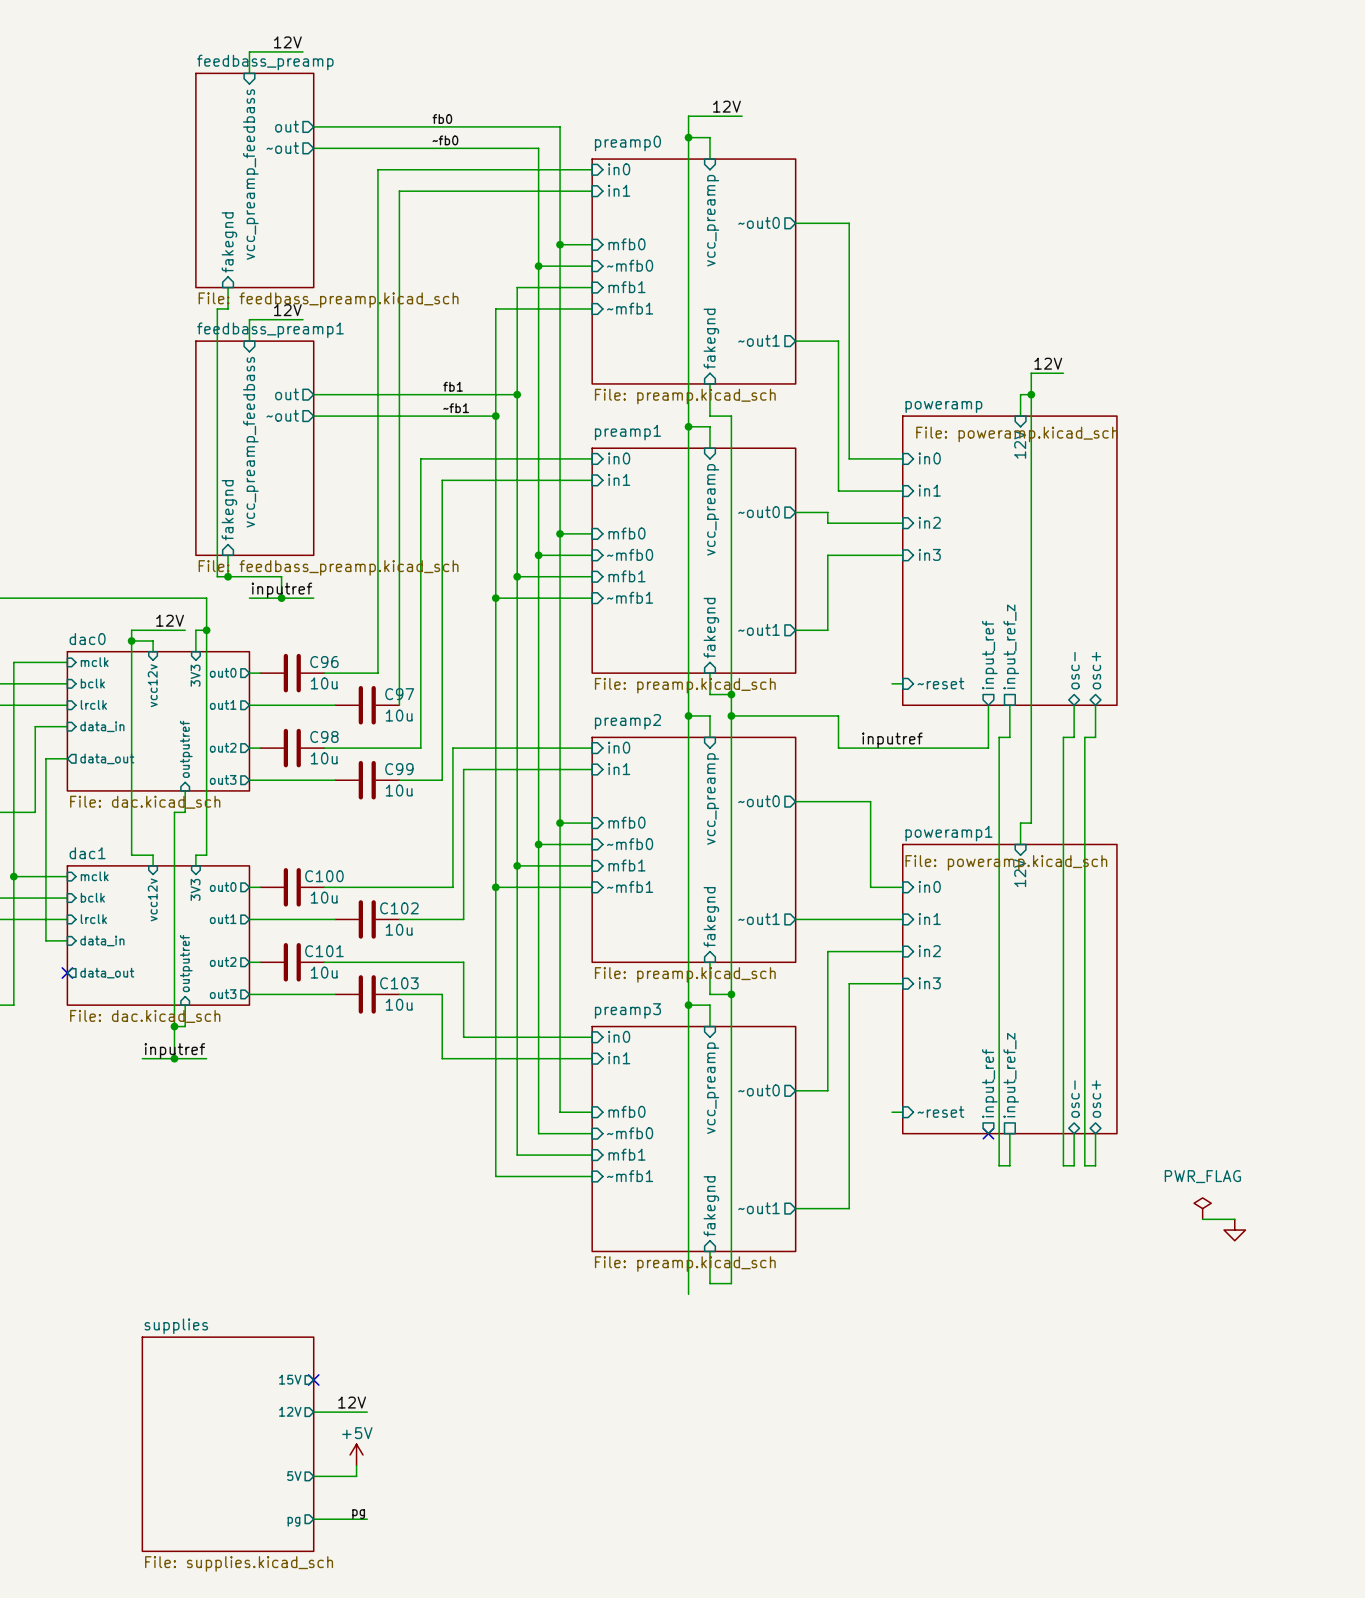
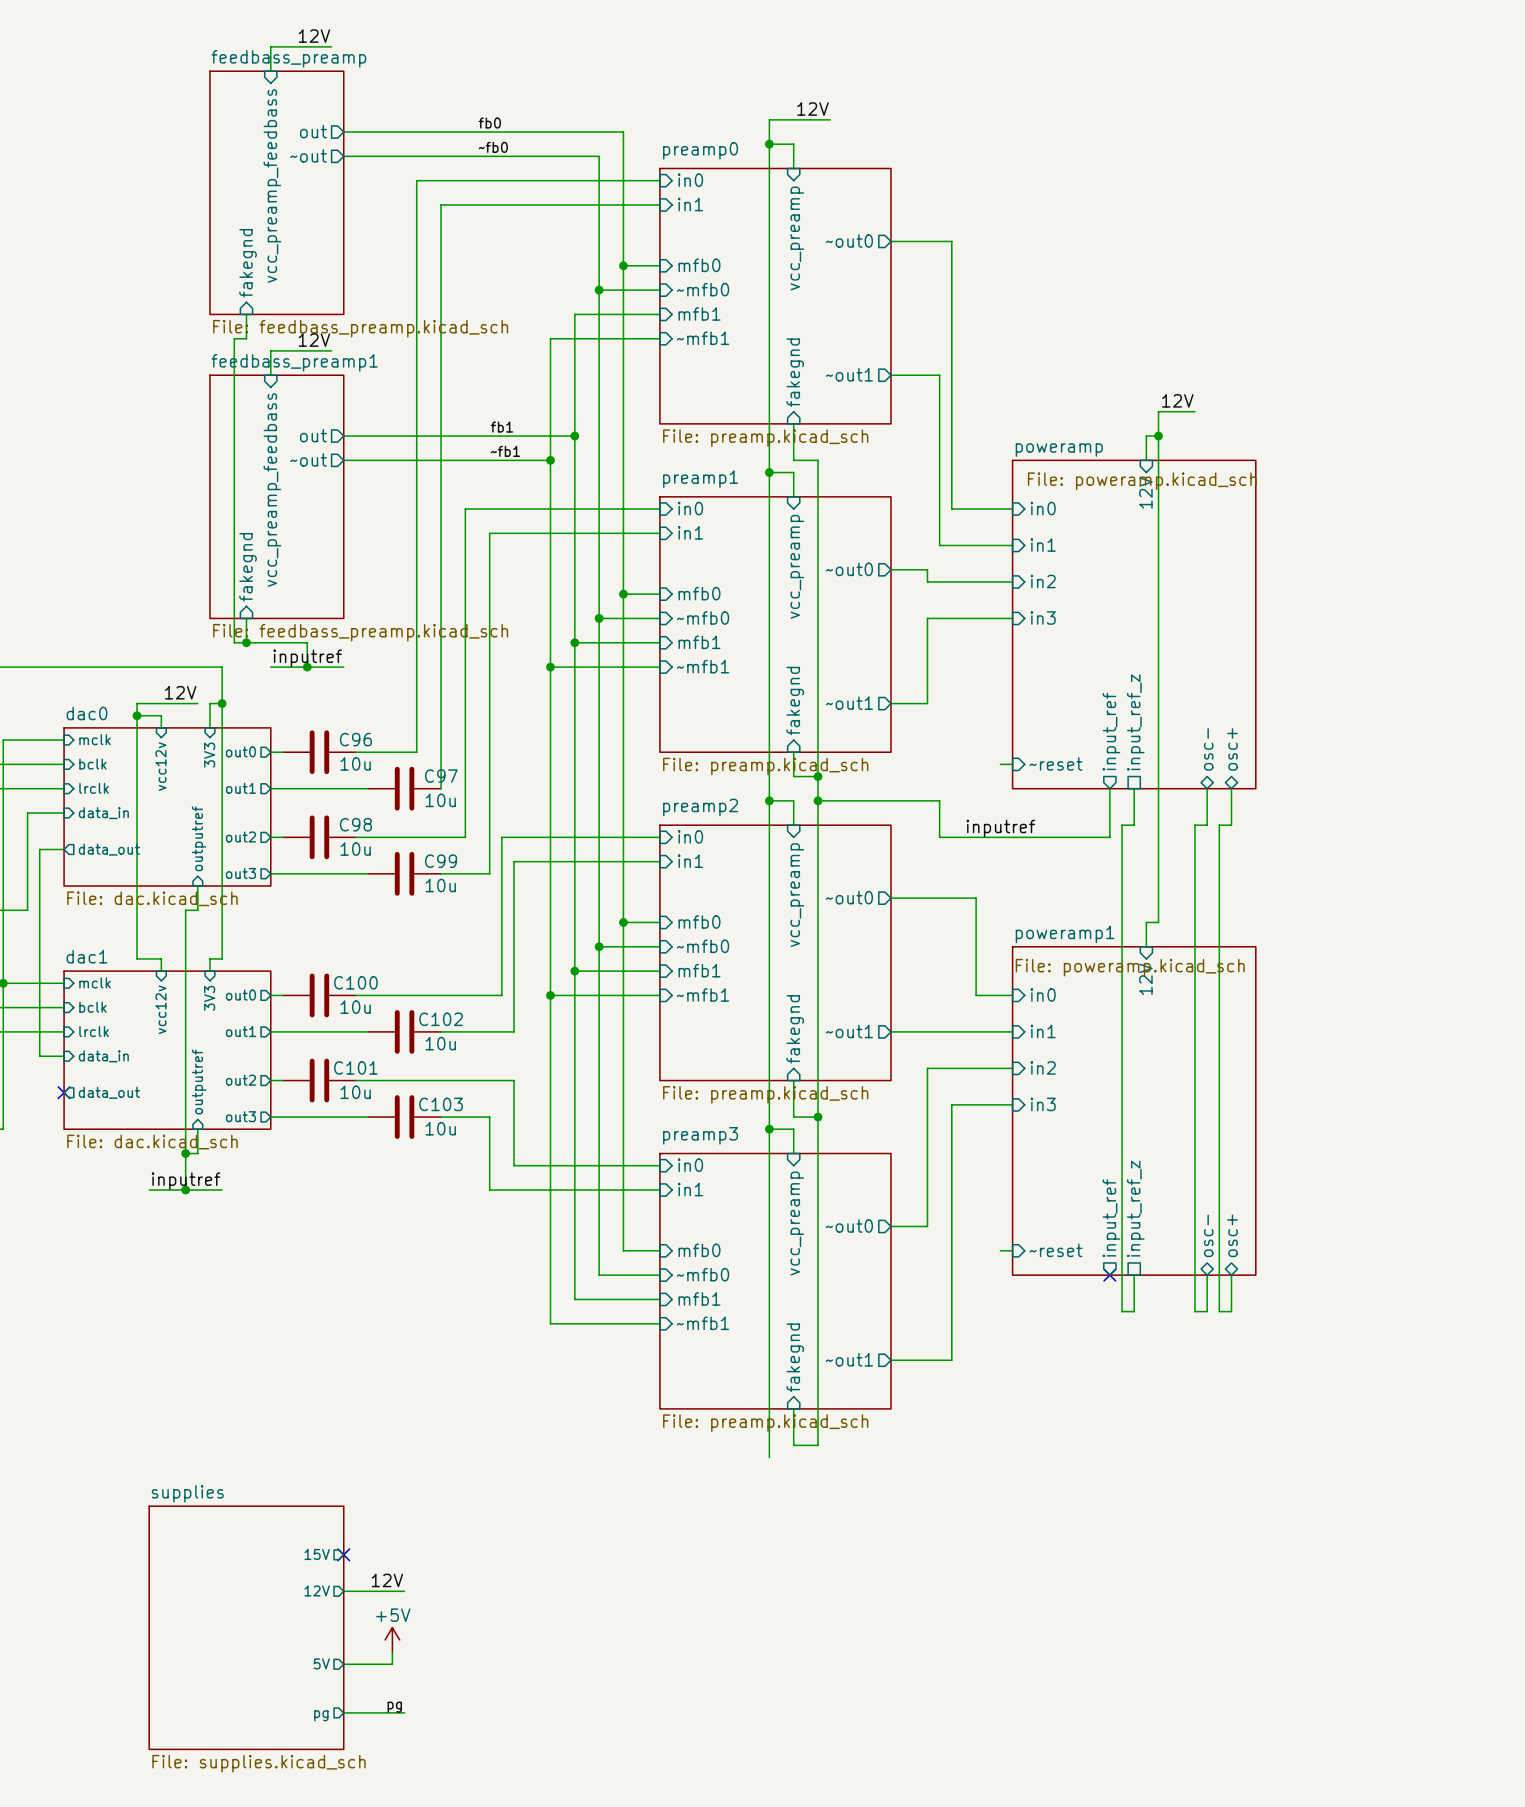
power symbol: PWR_FLAG (1202, 1208) -> none
wire: (1202, 1219) (1234, 1219) -> none
power symbol: (1234, 1230) -> none

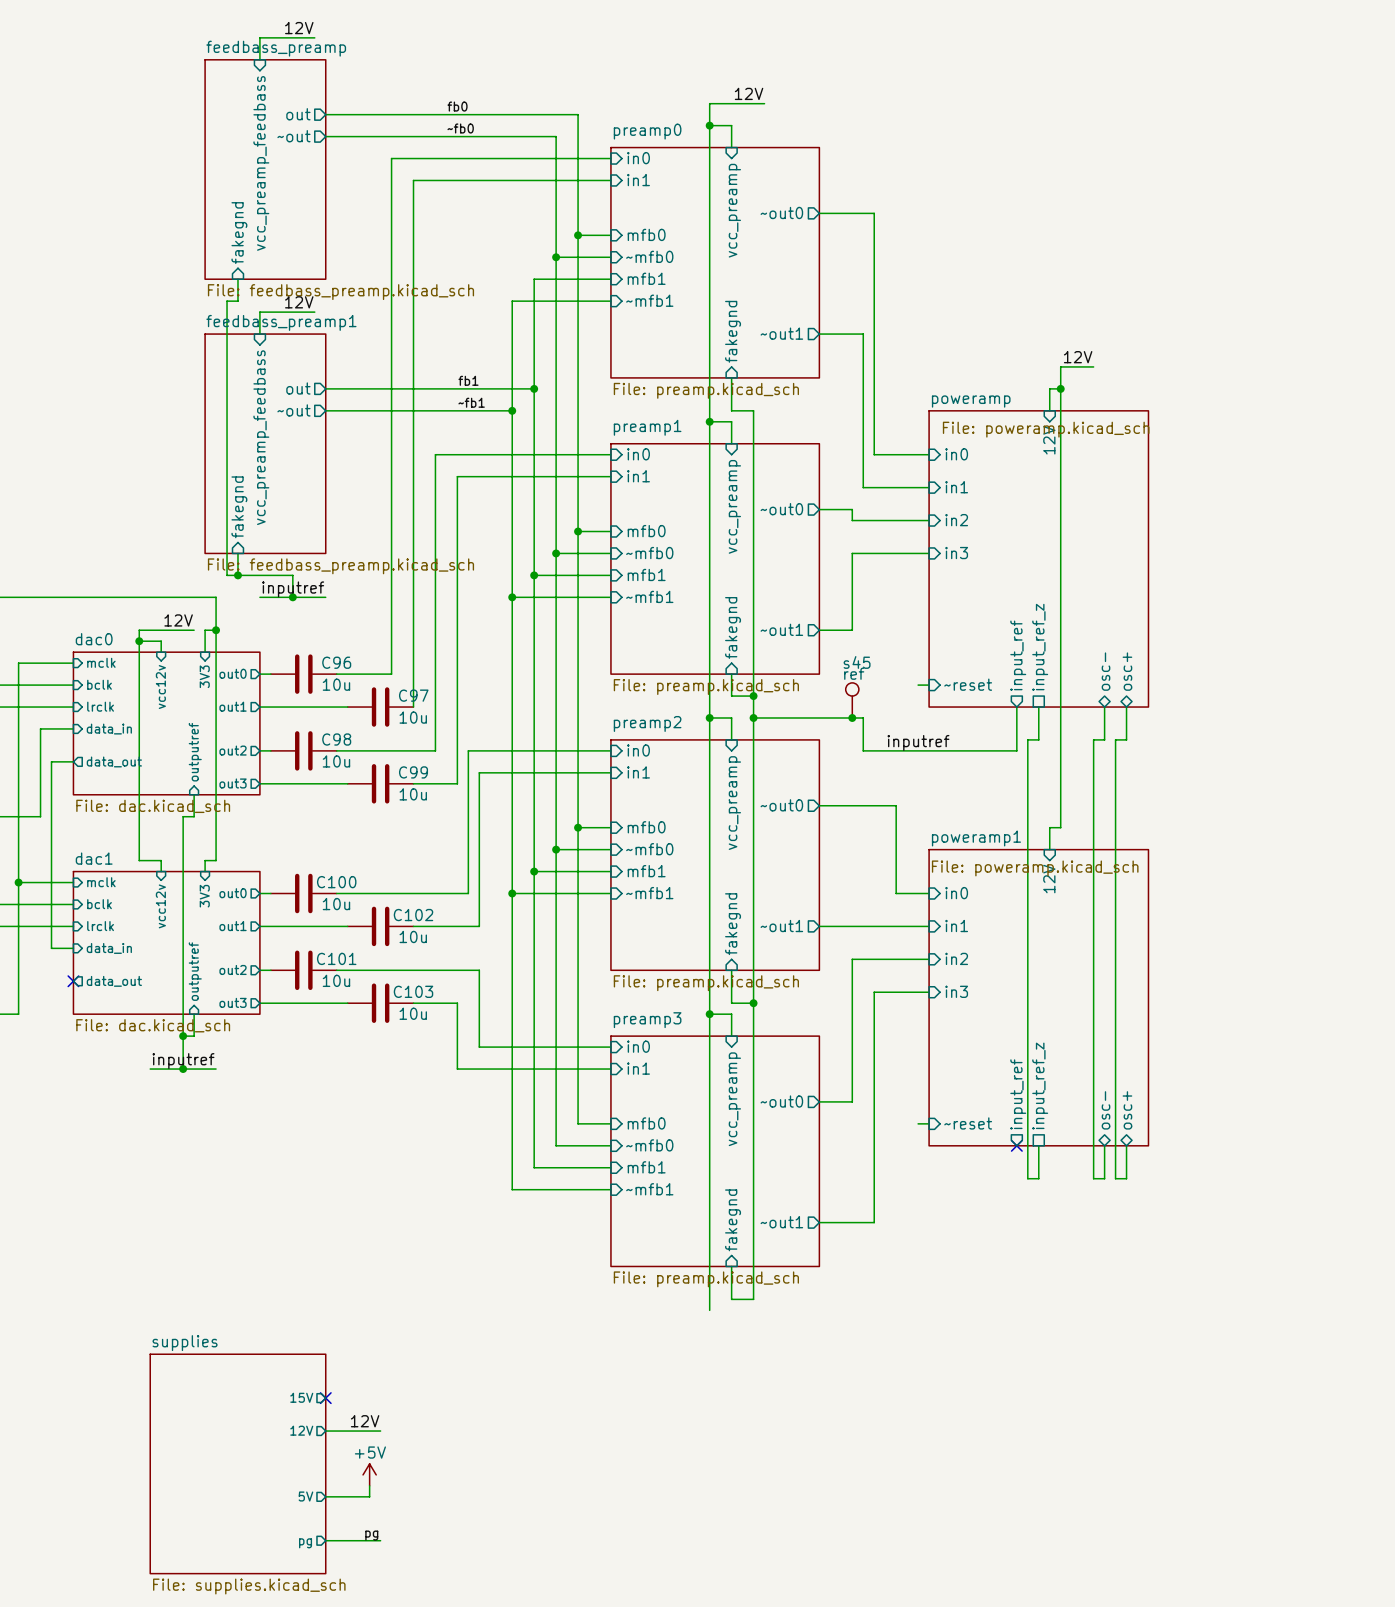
s45: none -> ref (852, 700)
junction: none -> (852, 717)

